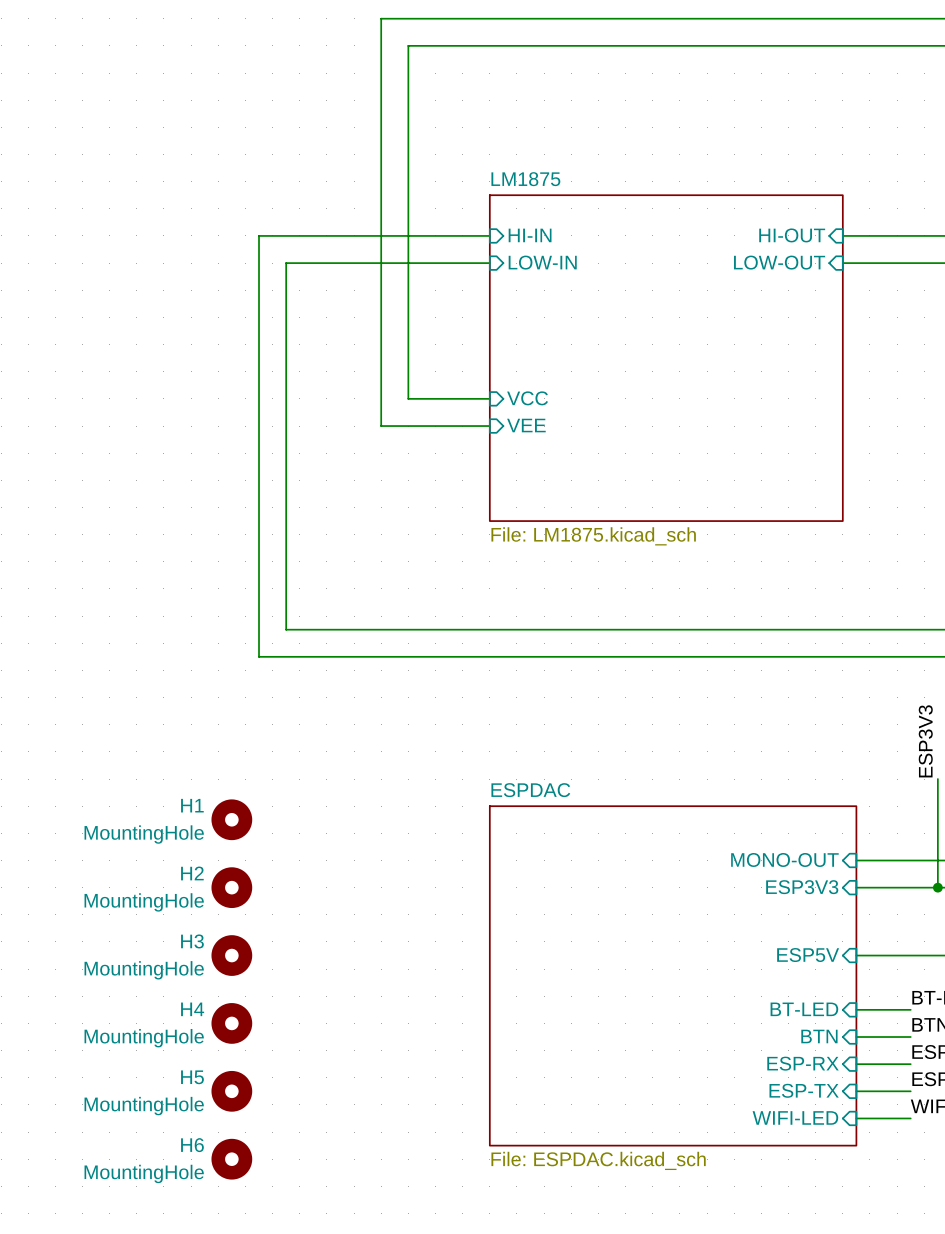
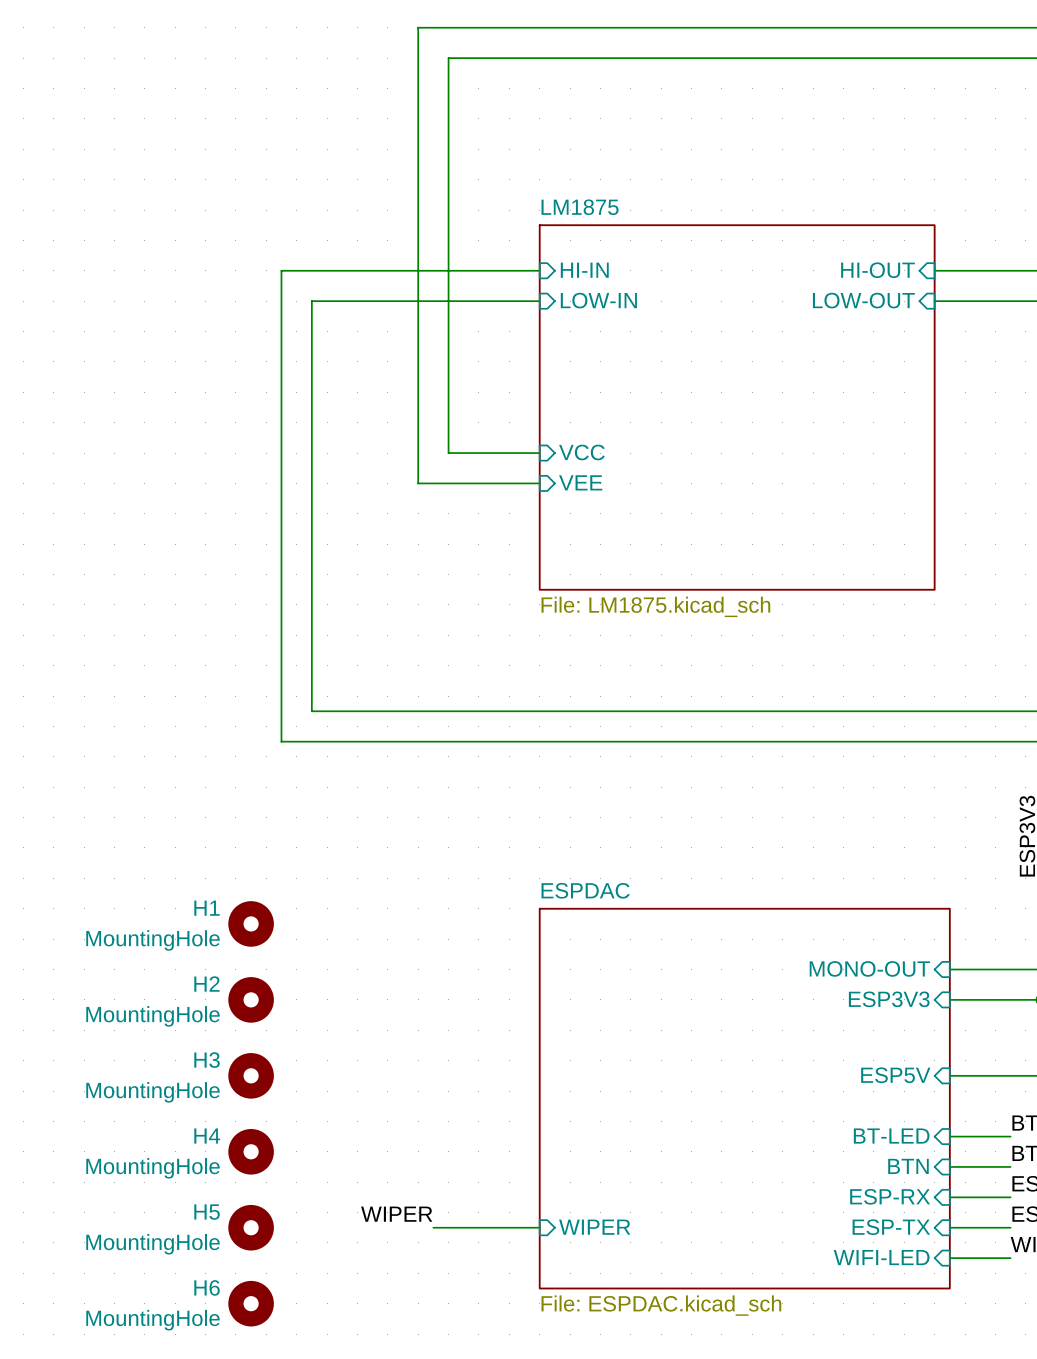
label: none -> WIPER (396, 1214)
sheet pin: none -> WIPER (594, 1227)
wire: none -> (433, 1227) (539, 1227)

